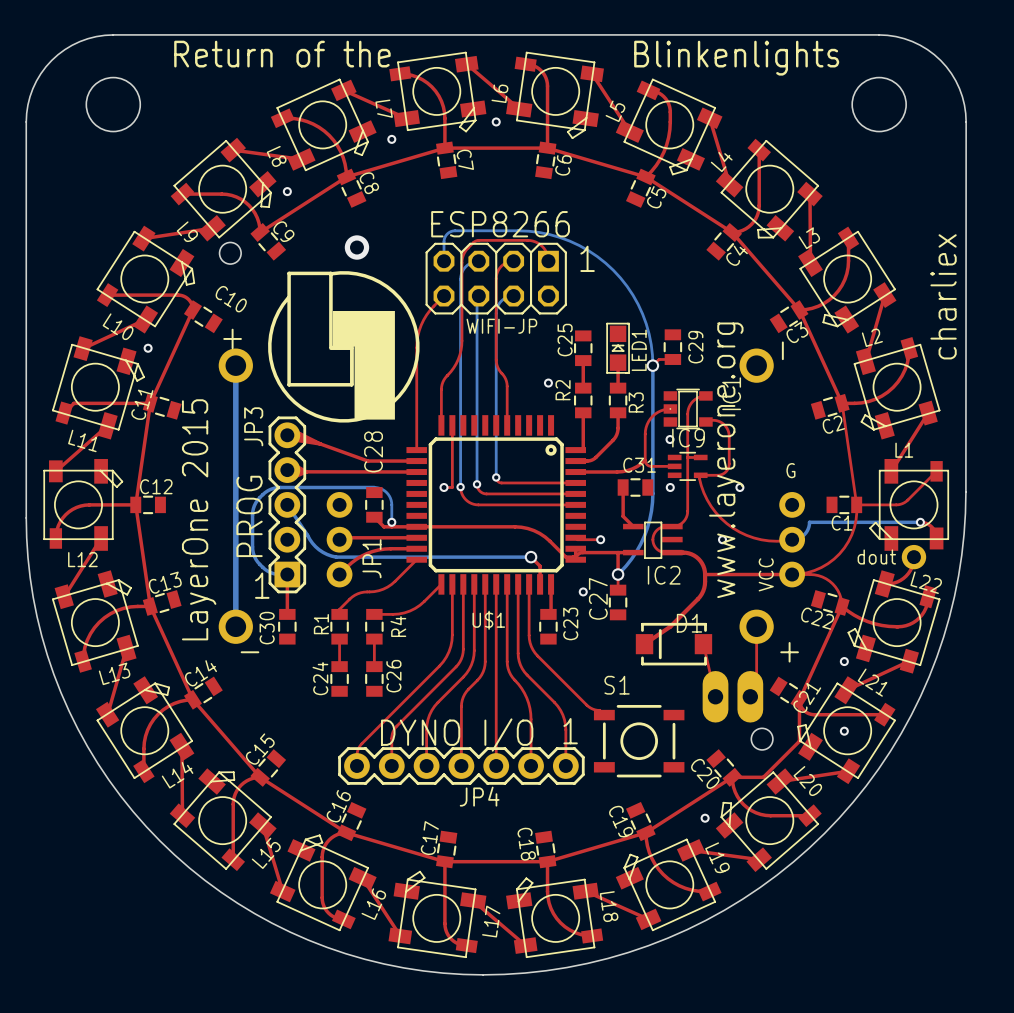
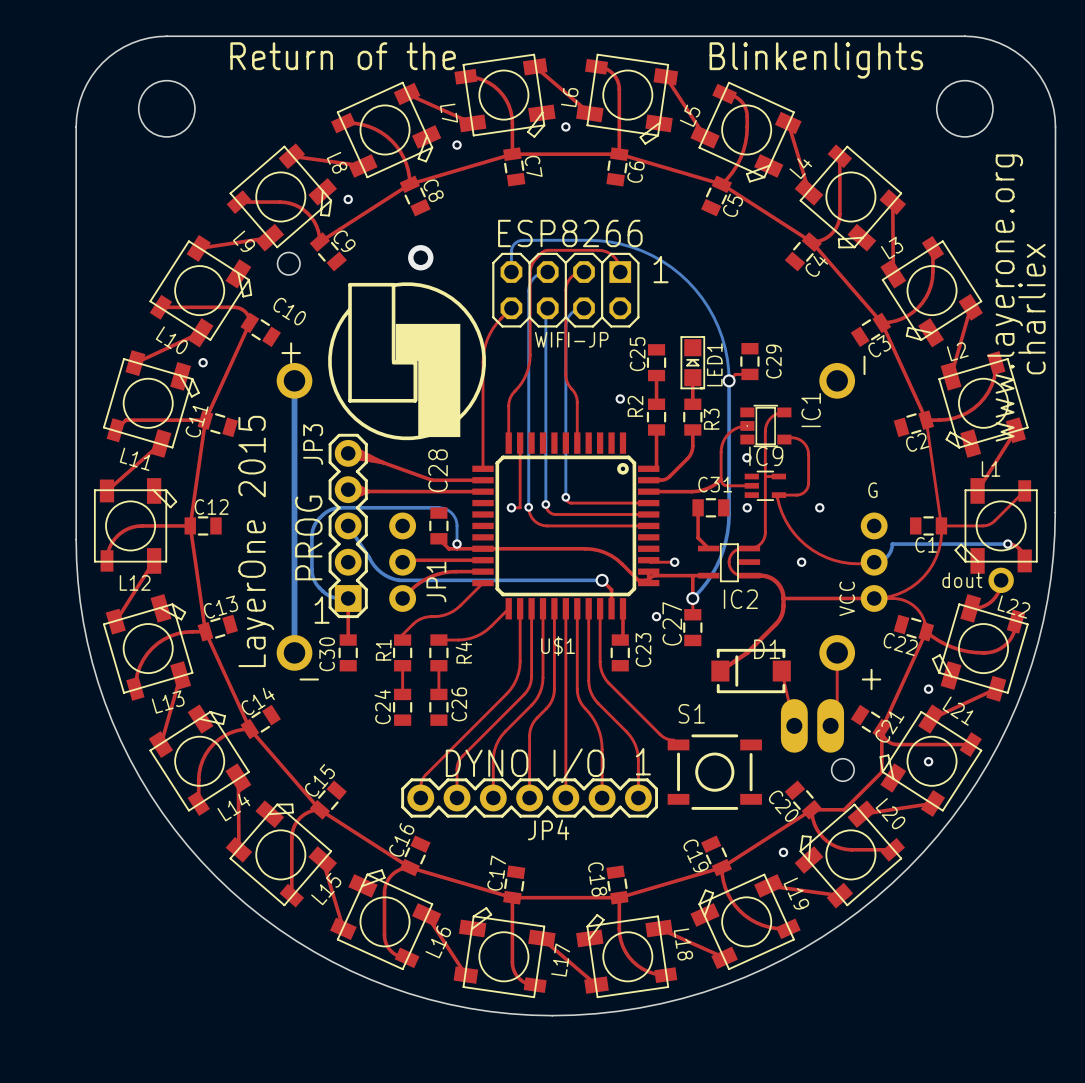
text position: www.layerone.org (726, 460) -> www.layerone.org (1005, 298)

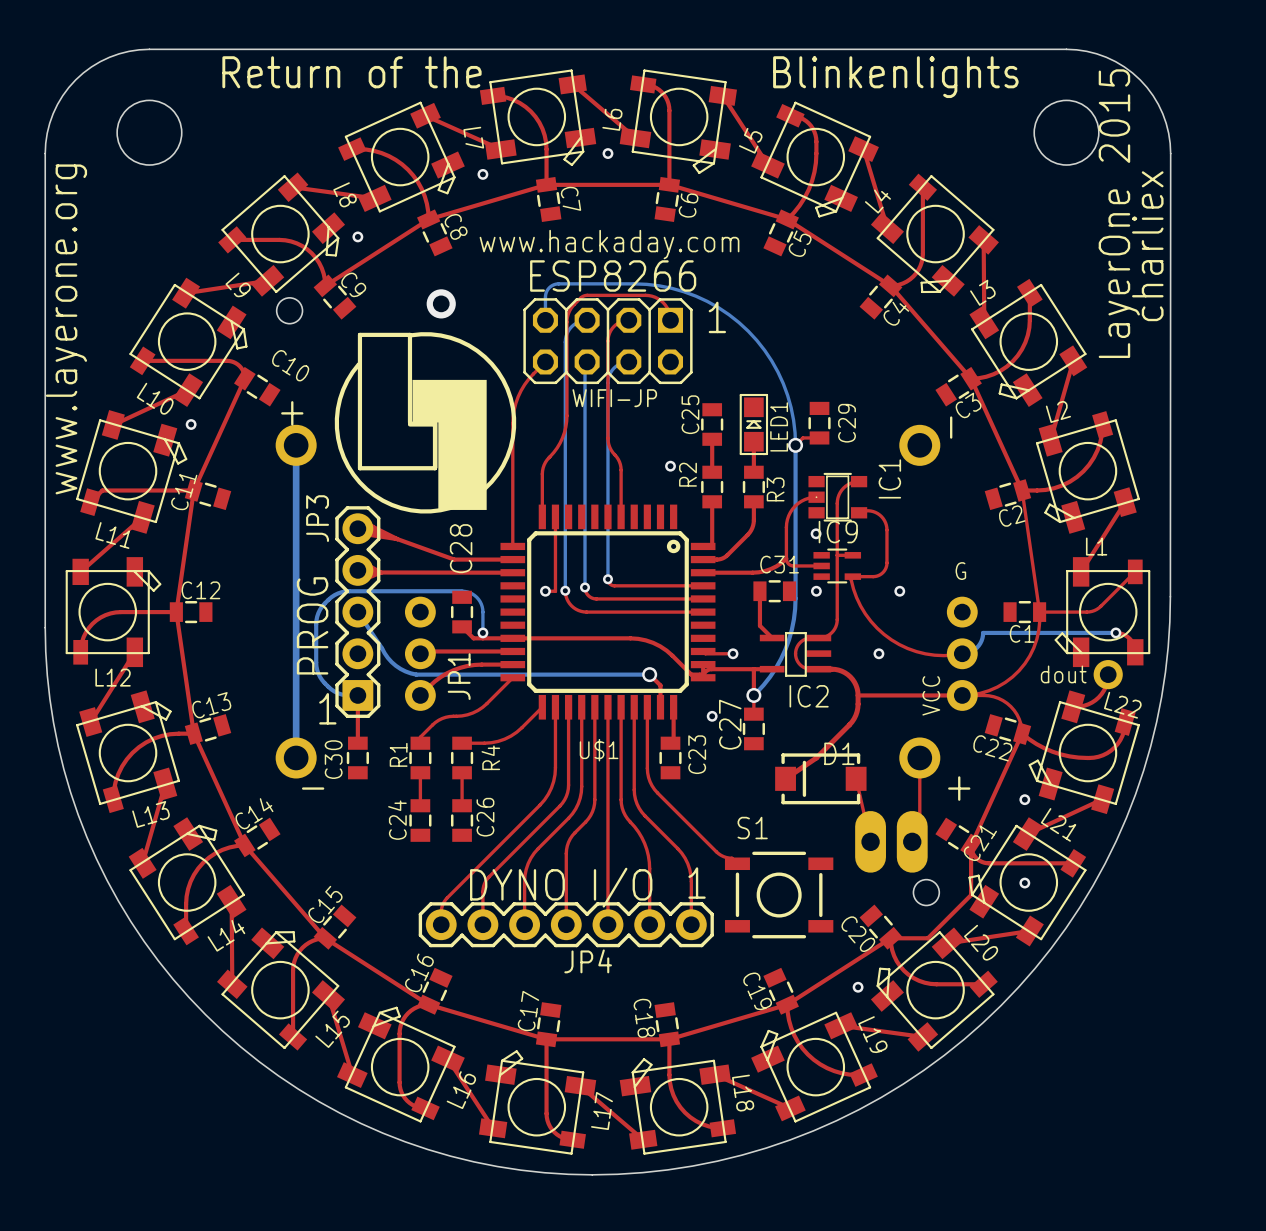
text: none -> LayerOne 2015 (1119, 213)
text: none -> www.hackaday.com (609, 244)
text: none -> www.layerone.org (66, 329)
text: www.layerone.org (1005, 298) -> none
text position: charliex (1031, 309) -> charliex (1147, 246)
text: LayerOne 2015 (256, 541) -> none

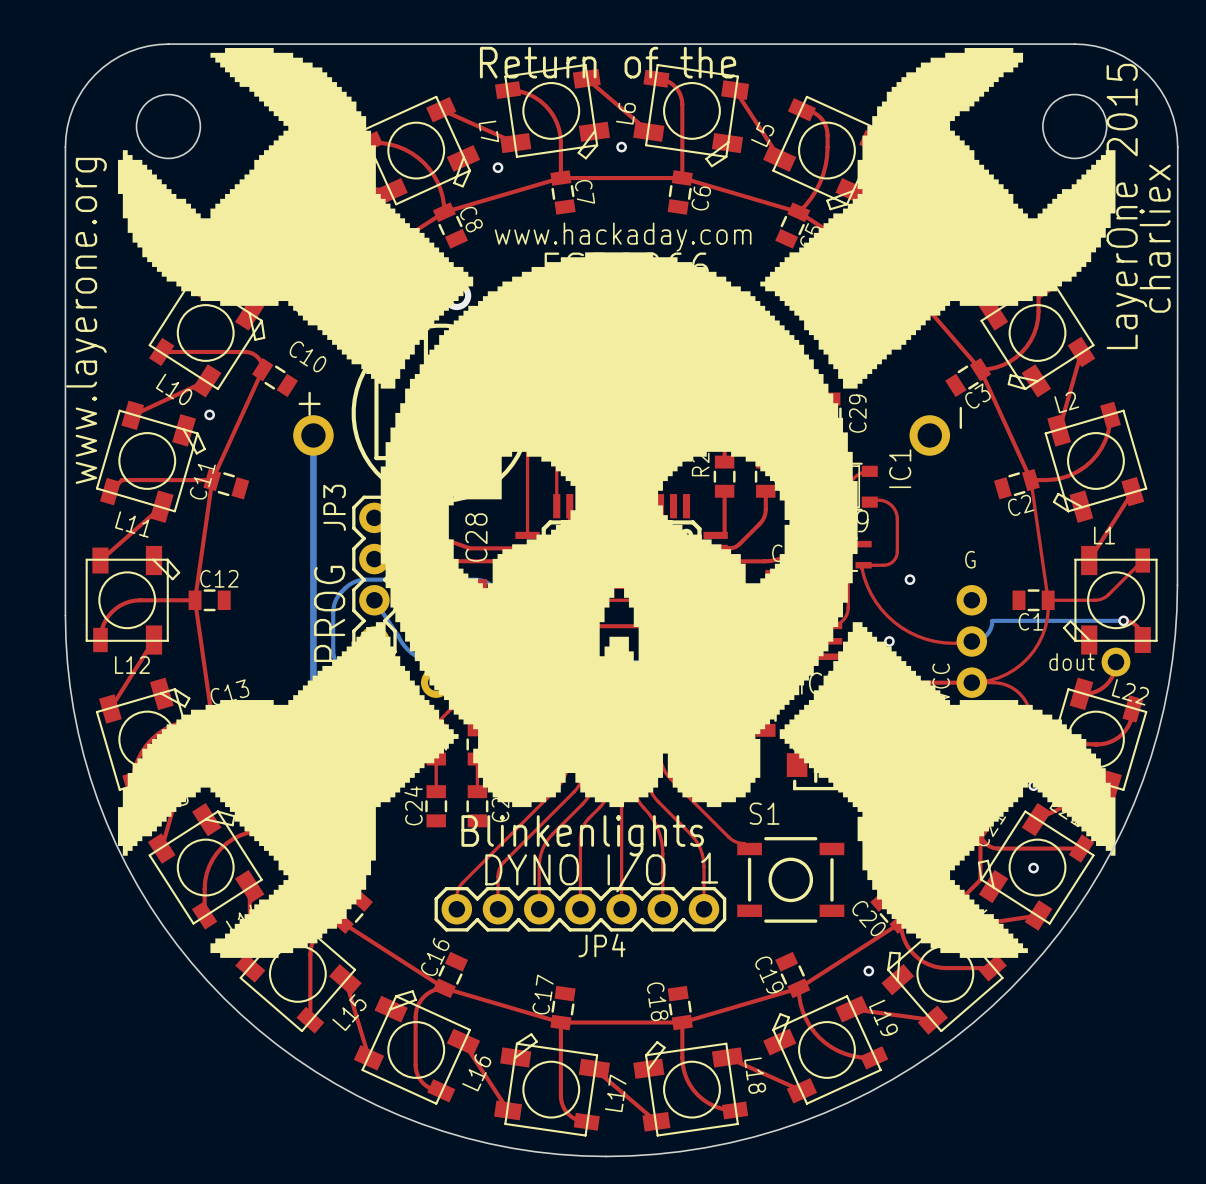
drawing: none -> [117, 47, 1116, 958]
text position: Return of the (351, 72) -> Return of the (608, 62)
text: Blinkenlights (895, 77) -> none
text: none -> Blinkenlights (582, 835)

